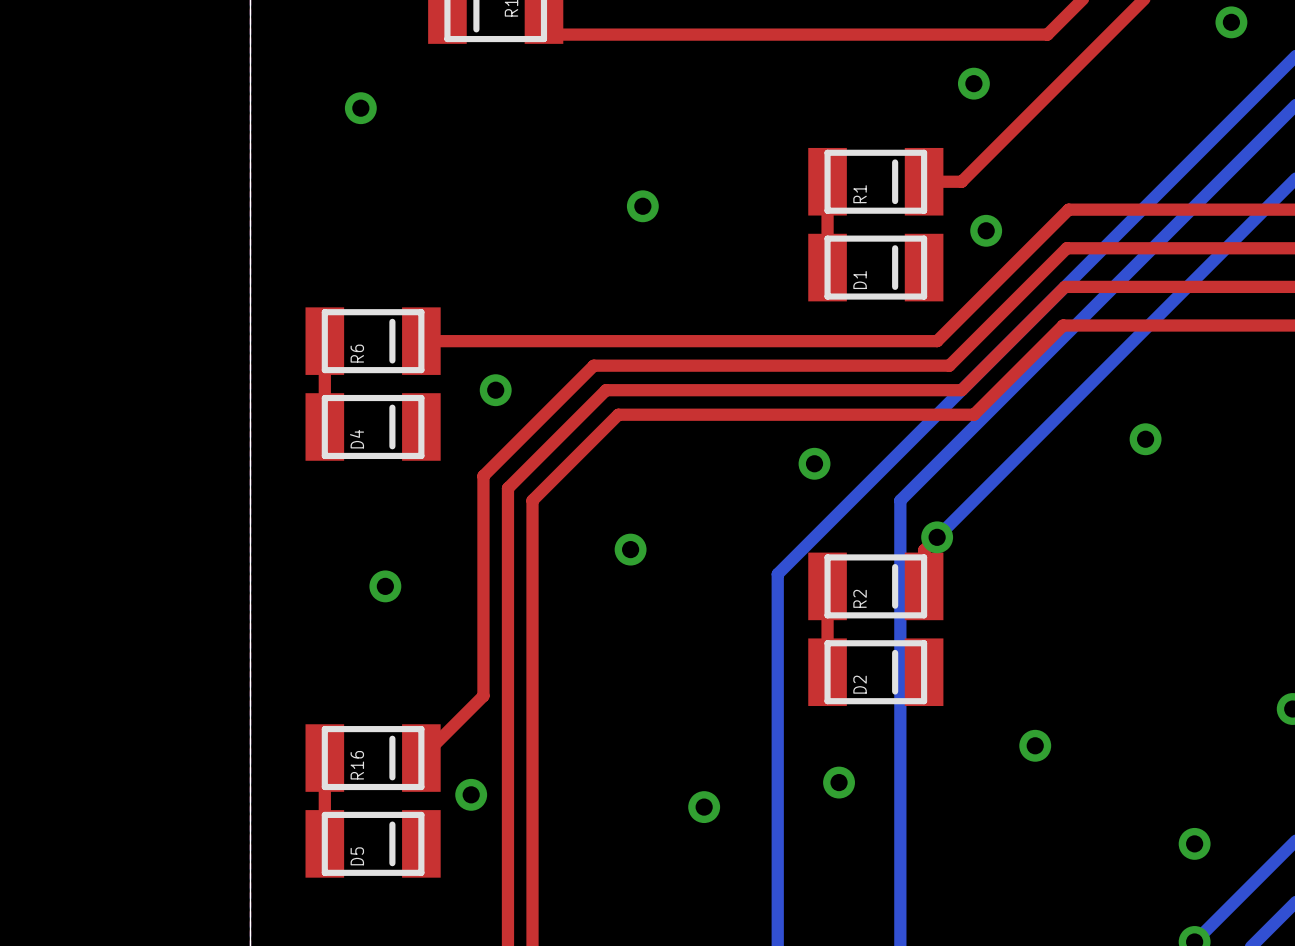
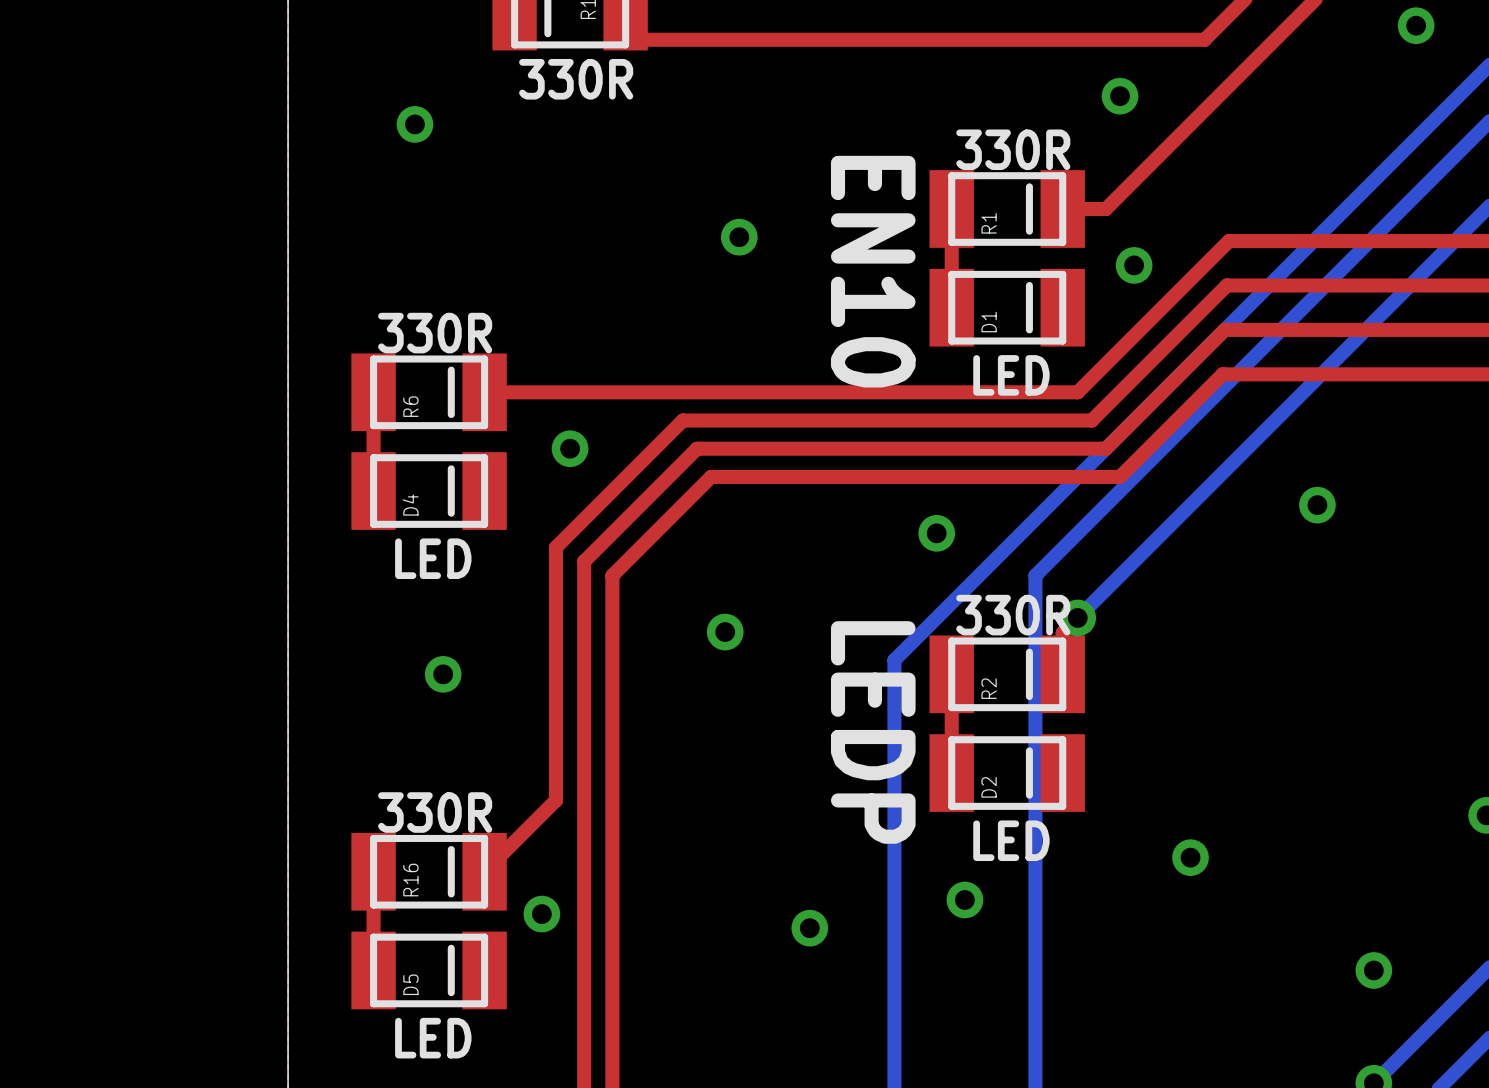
text: none -> 330R (576, 79)
text: none -> 330R (1013, 149)
text: none -> EN10 (873, 271)
text: none -> 330R (435, 333)
text: none -> LED (1011, 375)
text: none -> LED (433, 558)
text: none -> 330R (1013, 615)
text: none -> LEDP (873, 732)
text: none -> 330R (435, 812)
text: none -> LED (1011, 840)
text: none -> LED (433, 1038)

